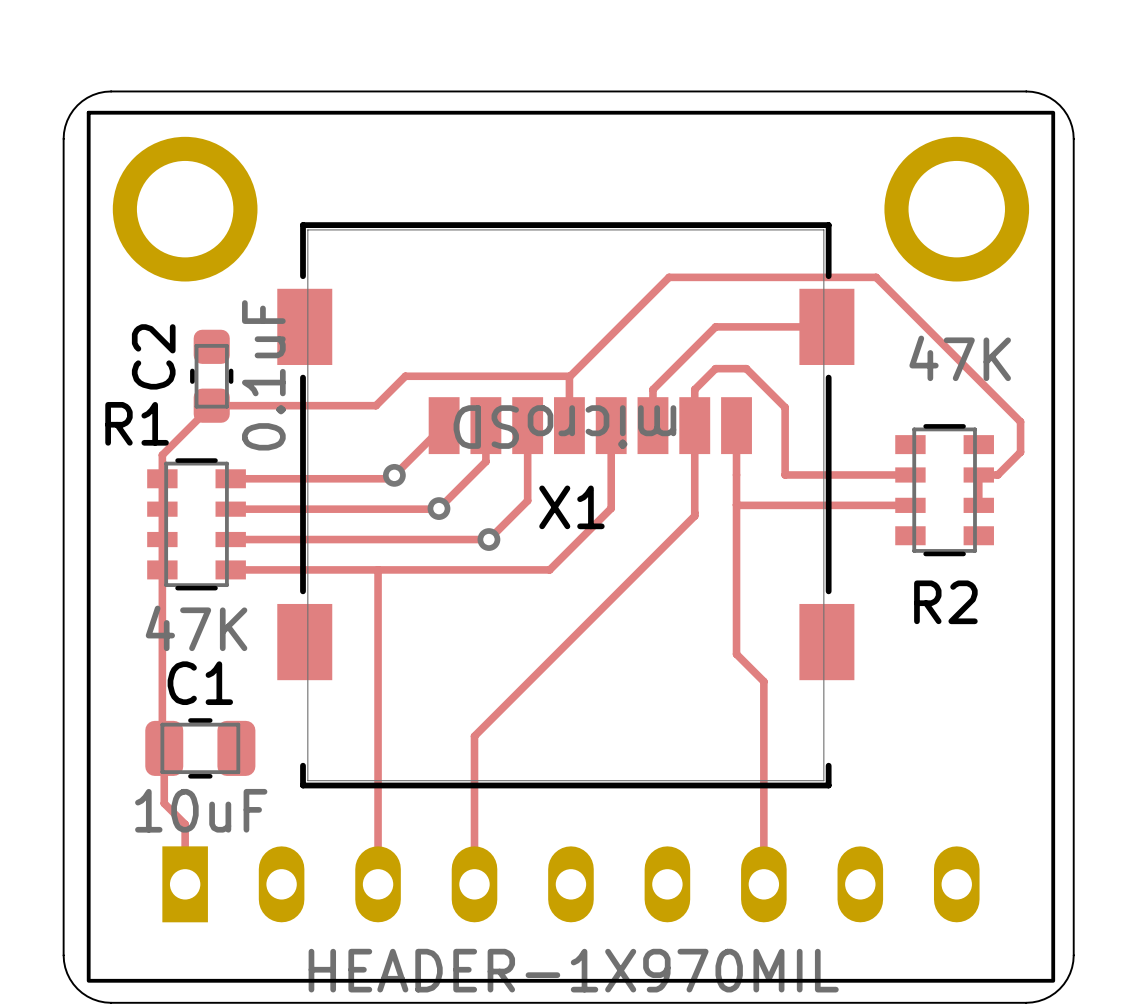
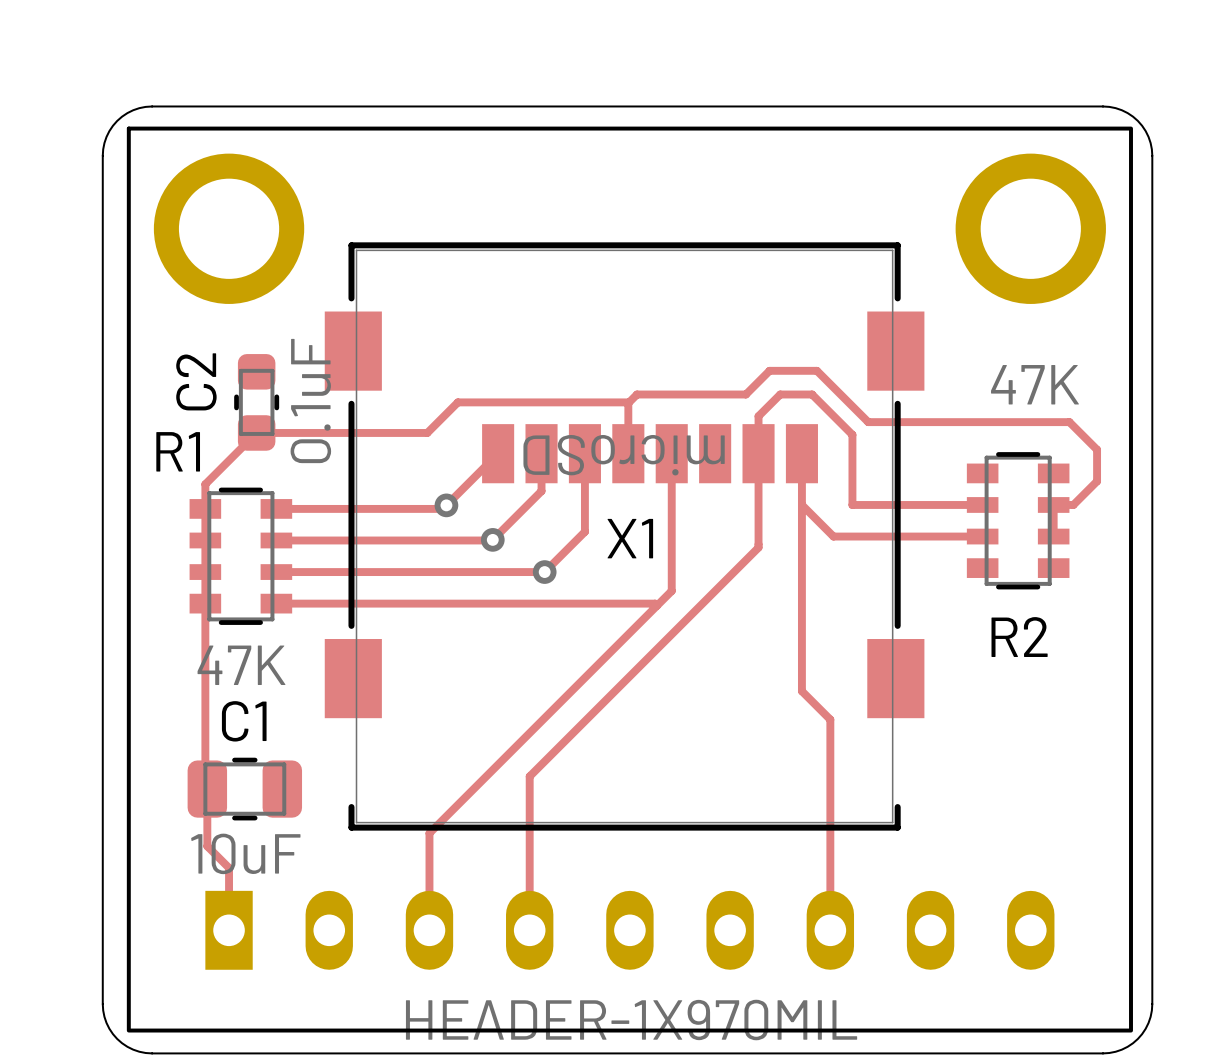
track: (826, 326) (715, 326) (652, 389) (652, 425) -> none
track: (577, 368) (669, 277) (876, 277) (993, 395) -> (637, 394) (745, 394) (769, 370) (816, 370) (868, 422) (1069, 422)
track: (736, 505) (766, 505) -> (801, 504) (833, 536)
track: (611, 508) (549, 569) -> (657, 605) (655, 603) (607, 603)
track: (378, 569) (378, 790) -> (671, 539) (671, 590) (429, 833)

